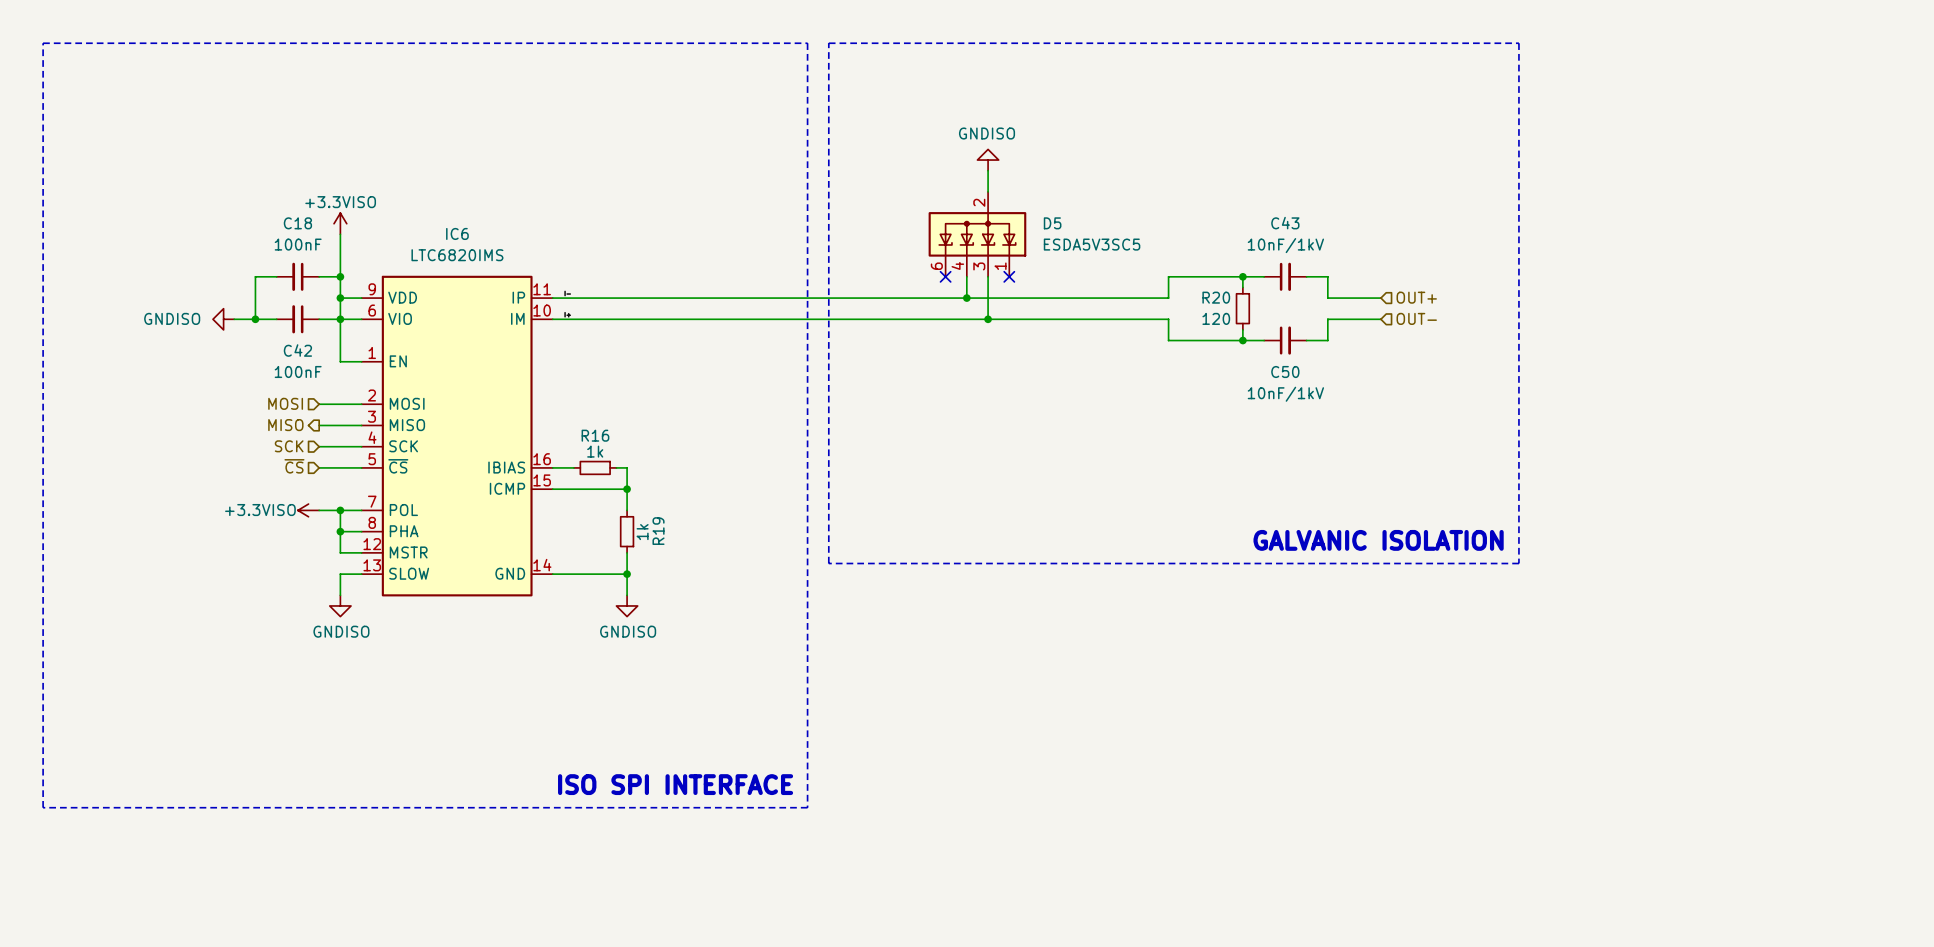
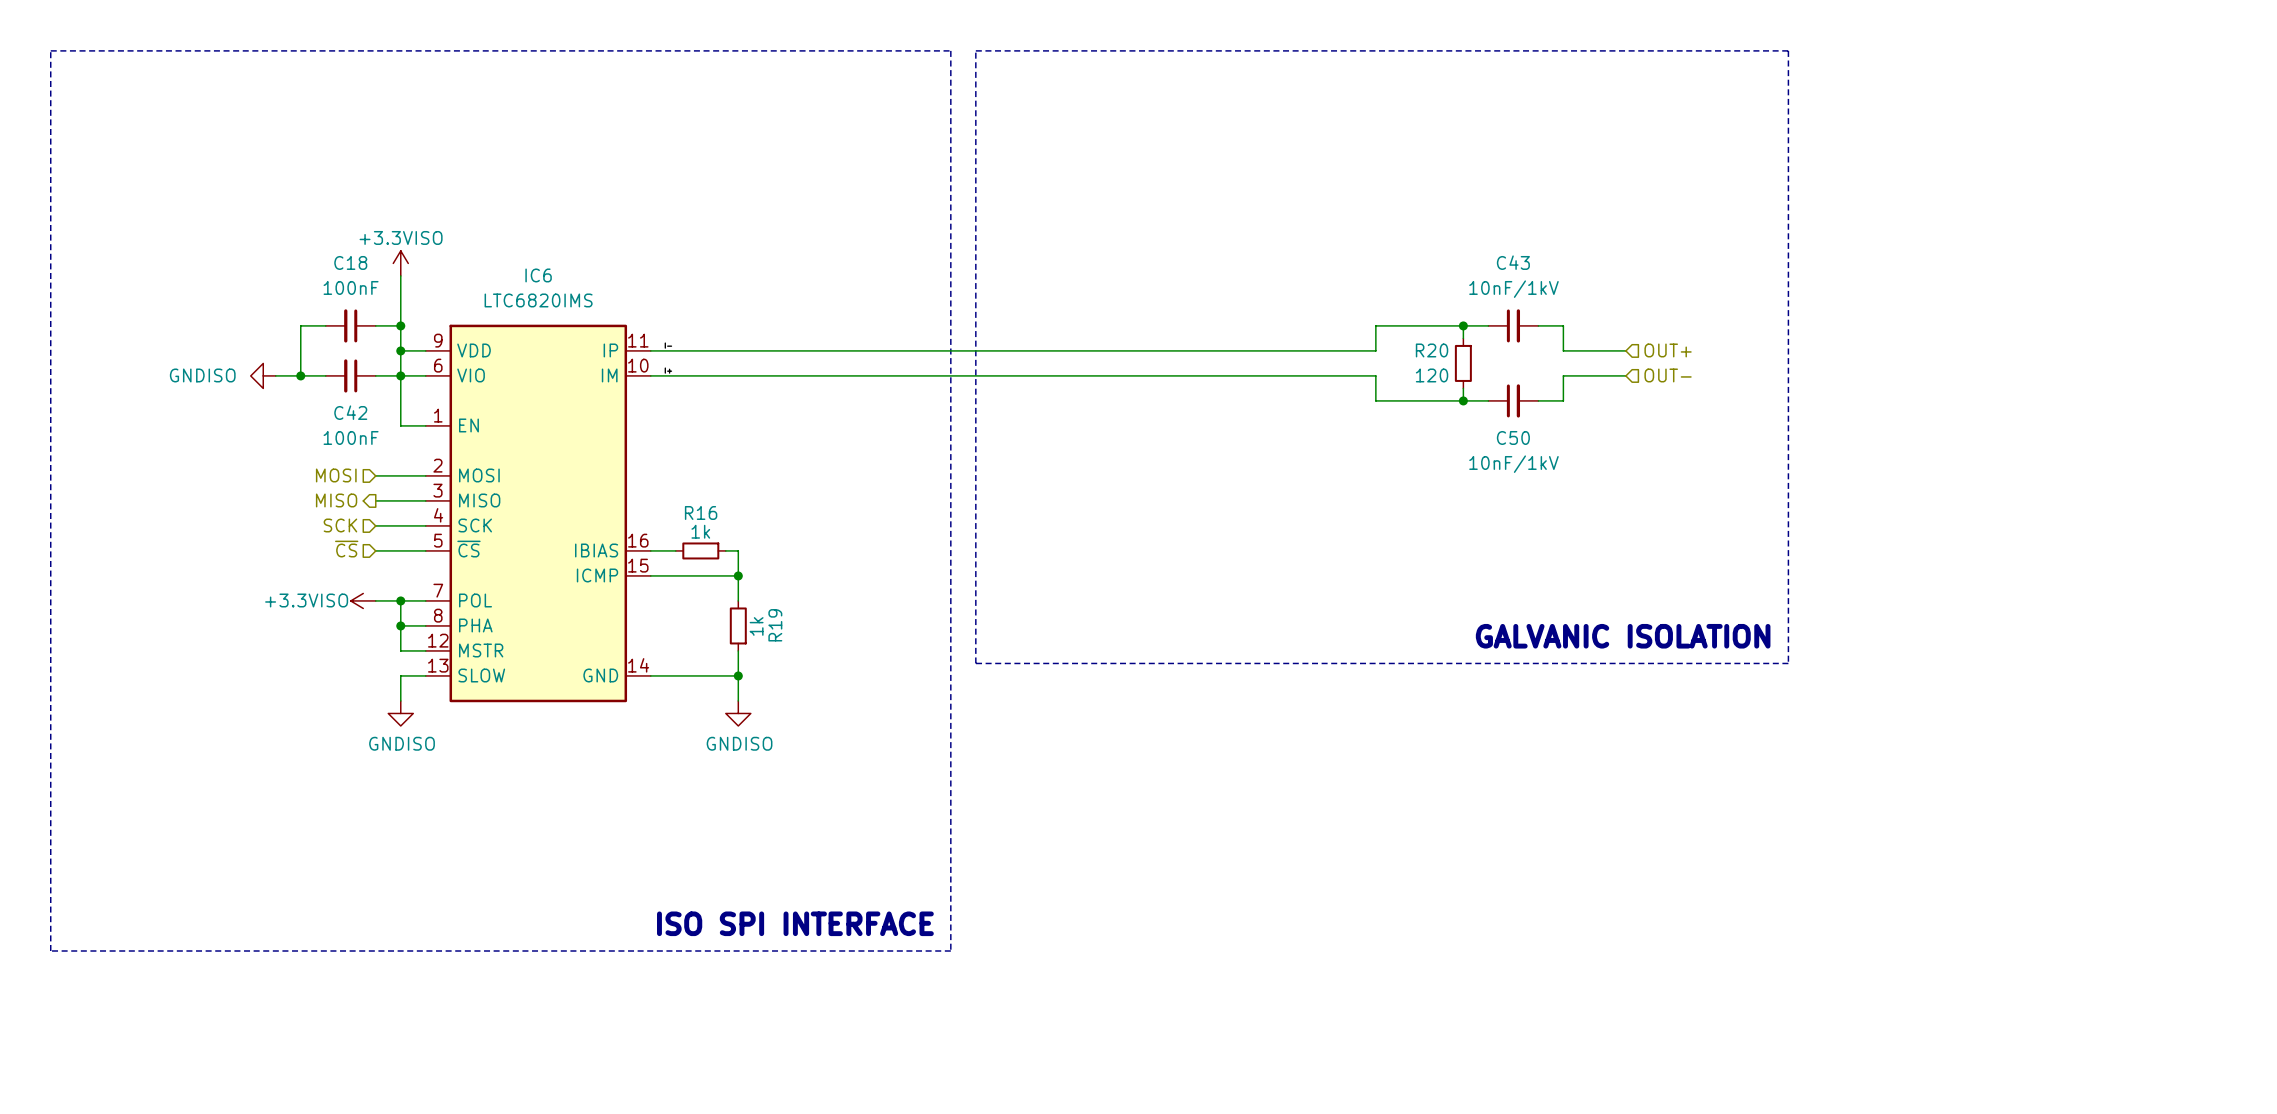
power symbol: GNDISO (988, 160) -> none
wire: (988, 170) (988, 191) -> none
D5: ESDA5V3SC5 (977, 234) -> none
no-connect mark: (945, 276) -> none
wire: (966, 276) (966, 298) -> none
wire: (988, 276) (988, 319) -> none
no-connect mark: (1009, 276) -> none
junction: (966, 298) -> none
junction: (988, 319) -> none

